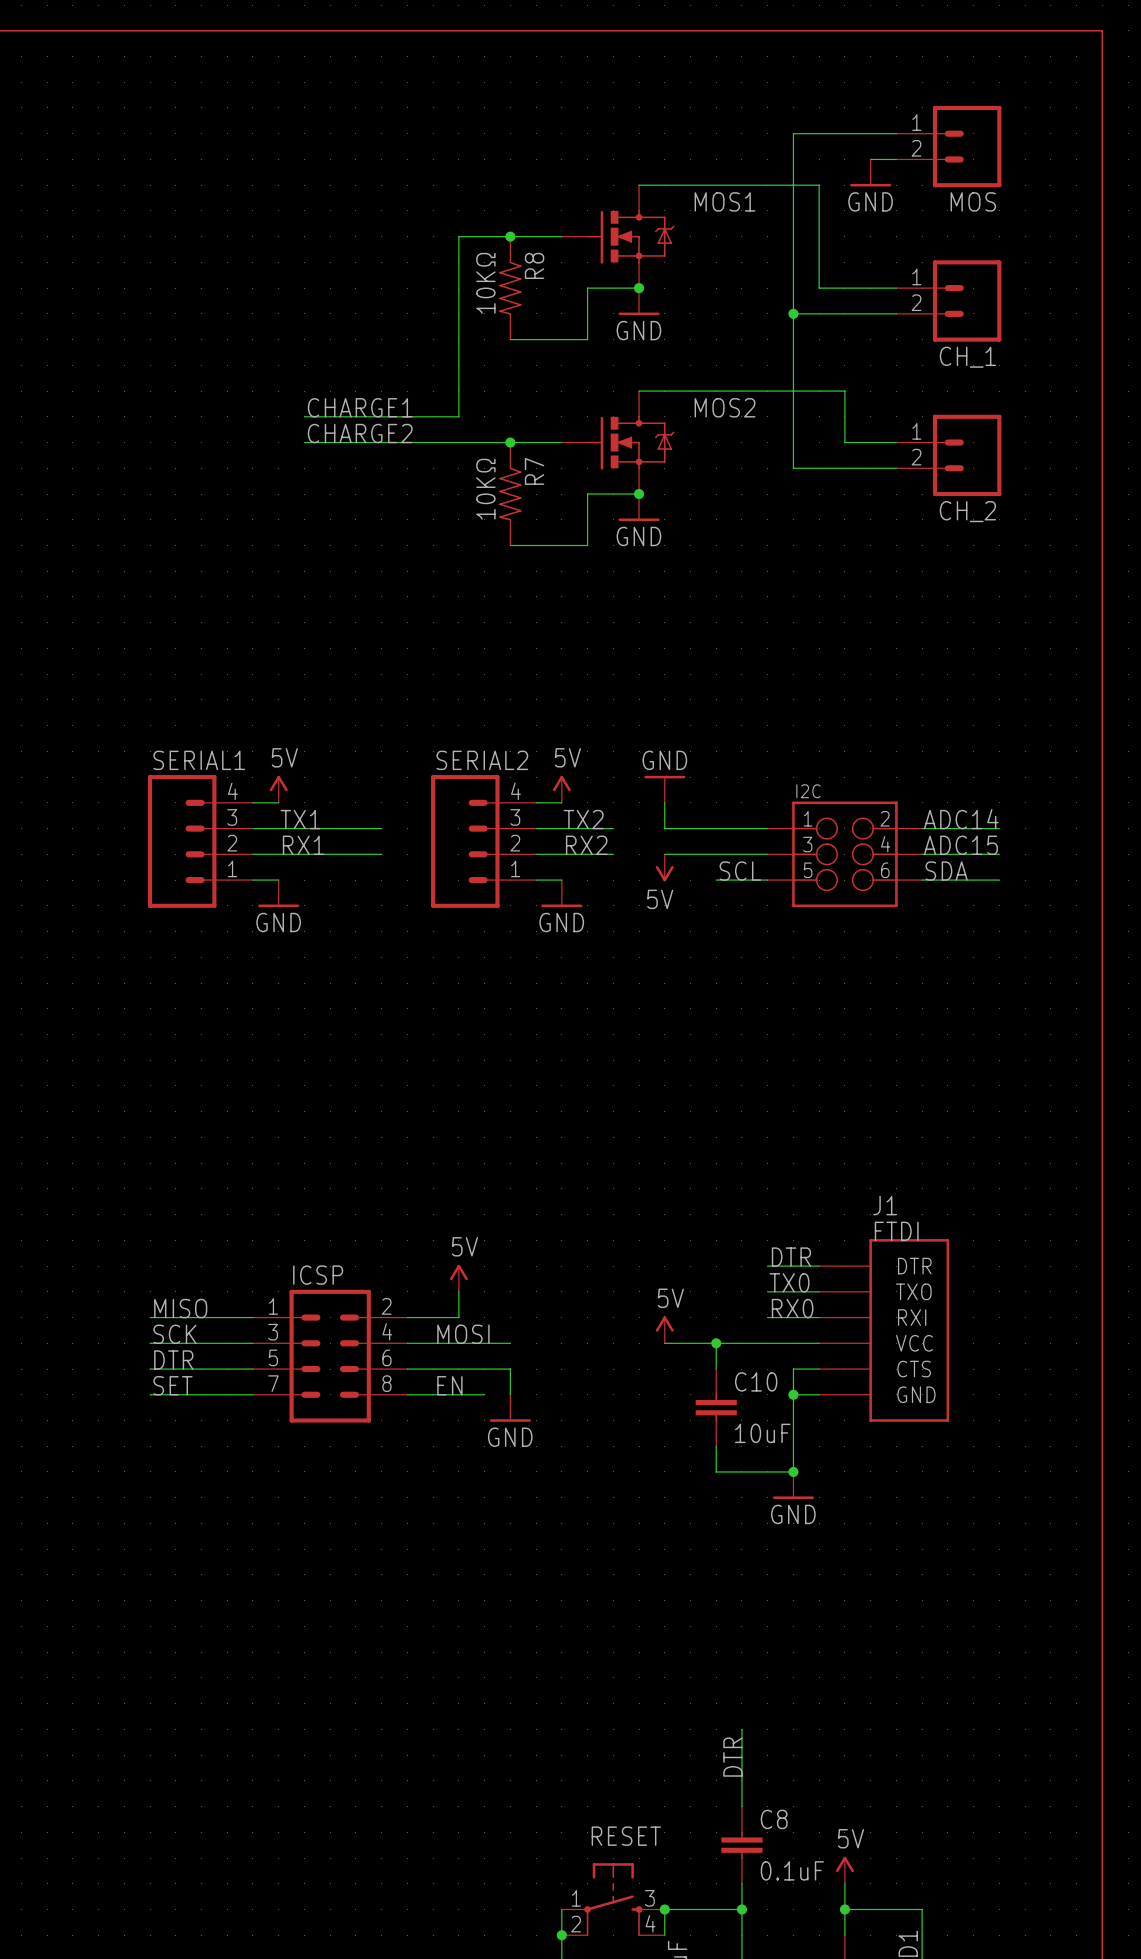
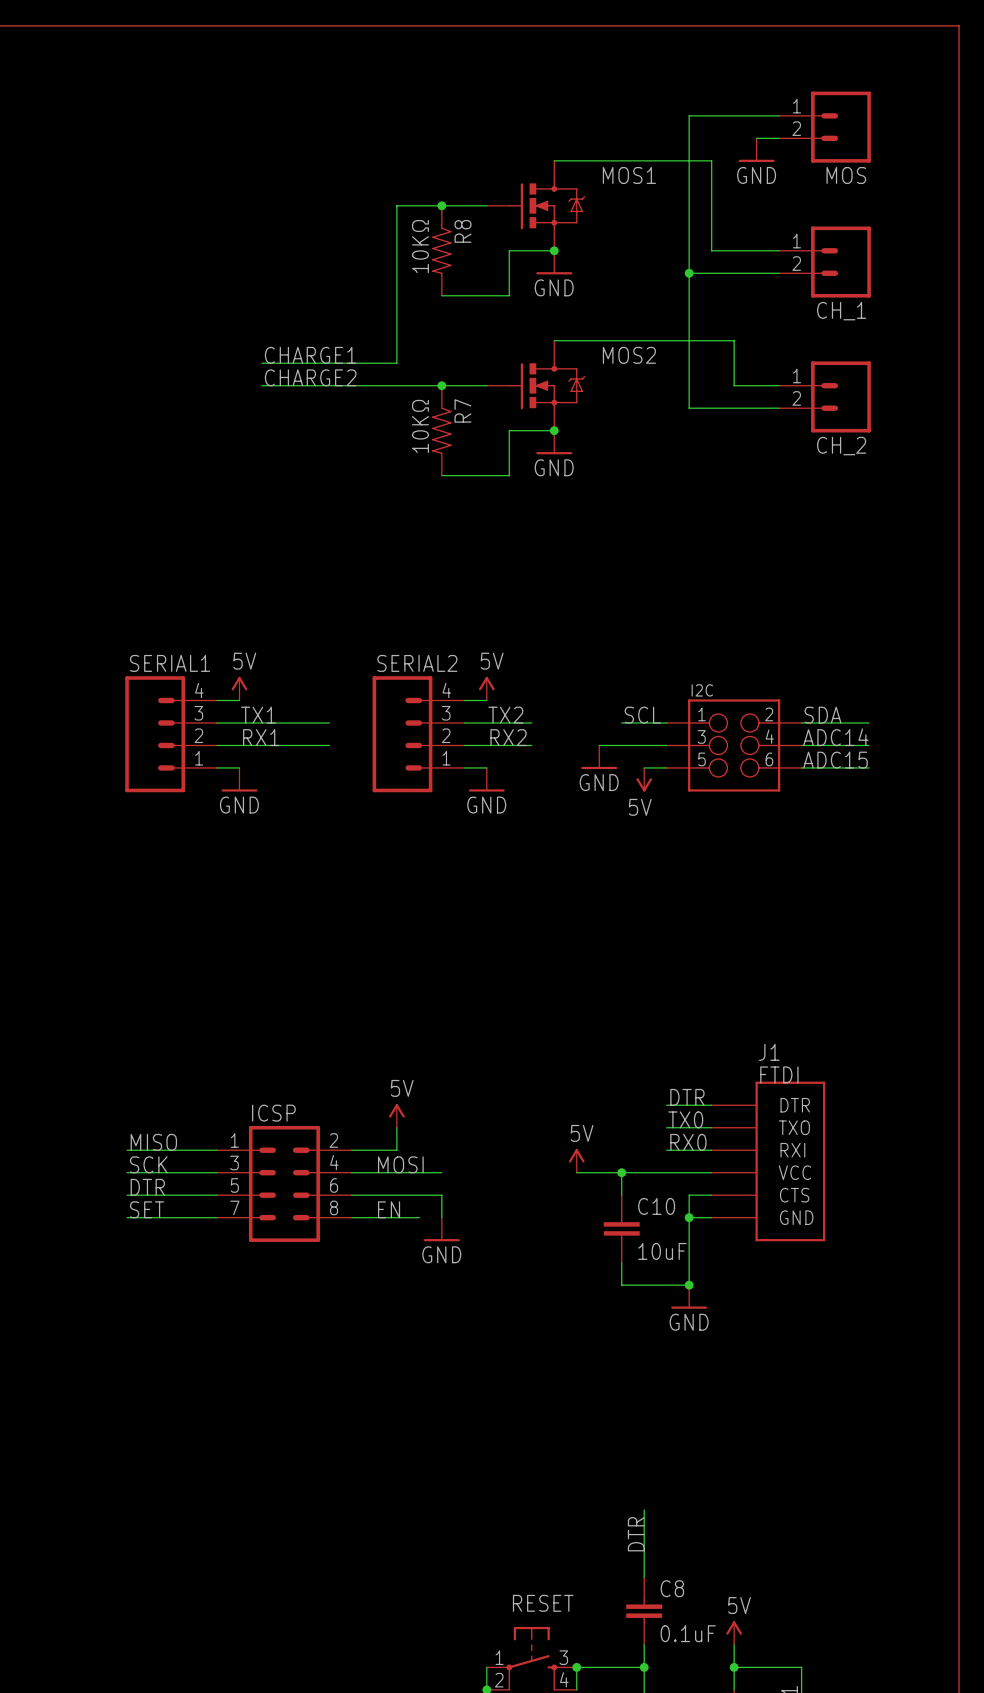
power symbol rotation: 0° (664, 777) -> 180° (599, 767)
power symbol position: GND (664, 789) -> GND (599, 757)
wire: (664, 802) (664, 828) (716, 828) -> none
label: ADC14 (961, 819) -> SDA (823, 715)
label: ADC15 (960, 845) -> ADC14 (835, 737)
wire: (664, 854) (690, 854) -> none
power symbol position: 5V (664, 867) -> 5V (644, 779)
label position: SCL (740, 871) -> SCL (642, 715)
label: SDA (946, 871) -> ADC15 (835, 760)
wire: (716, 880) (741, 880) -> none

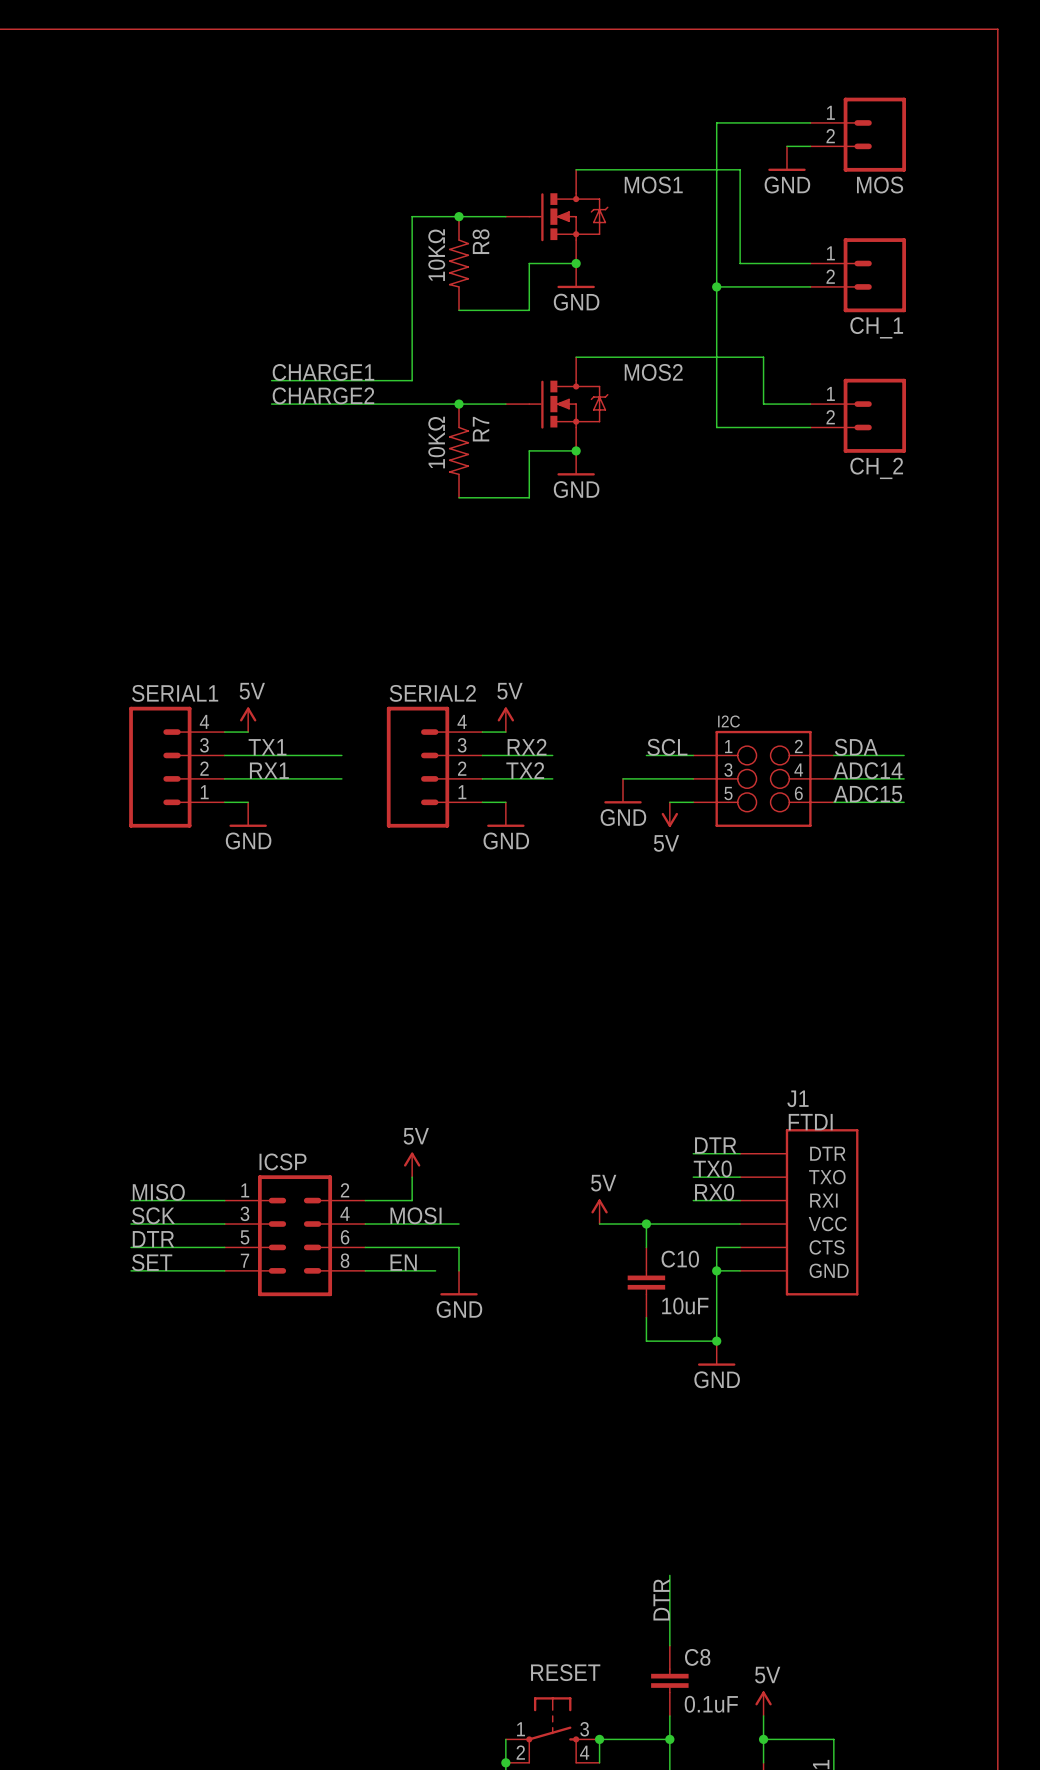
label: TX2 (505, 715) -> RX2 (527, 747)
label: RX2 (508, 737) -> TX2 (525, 770)

